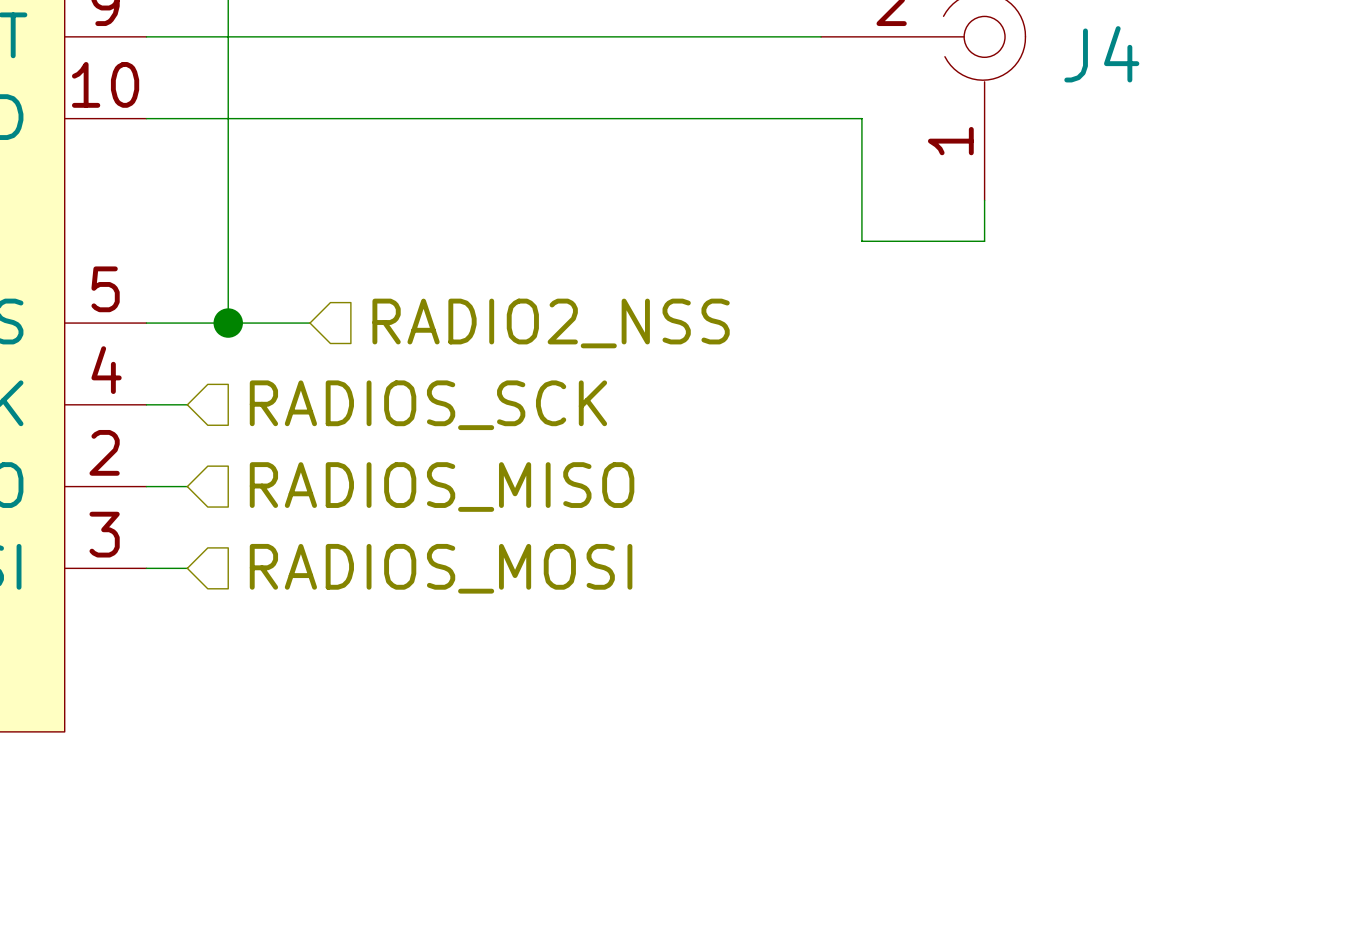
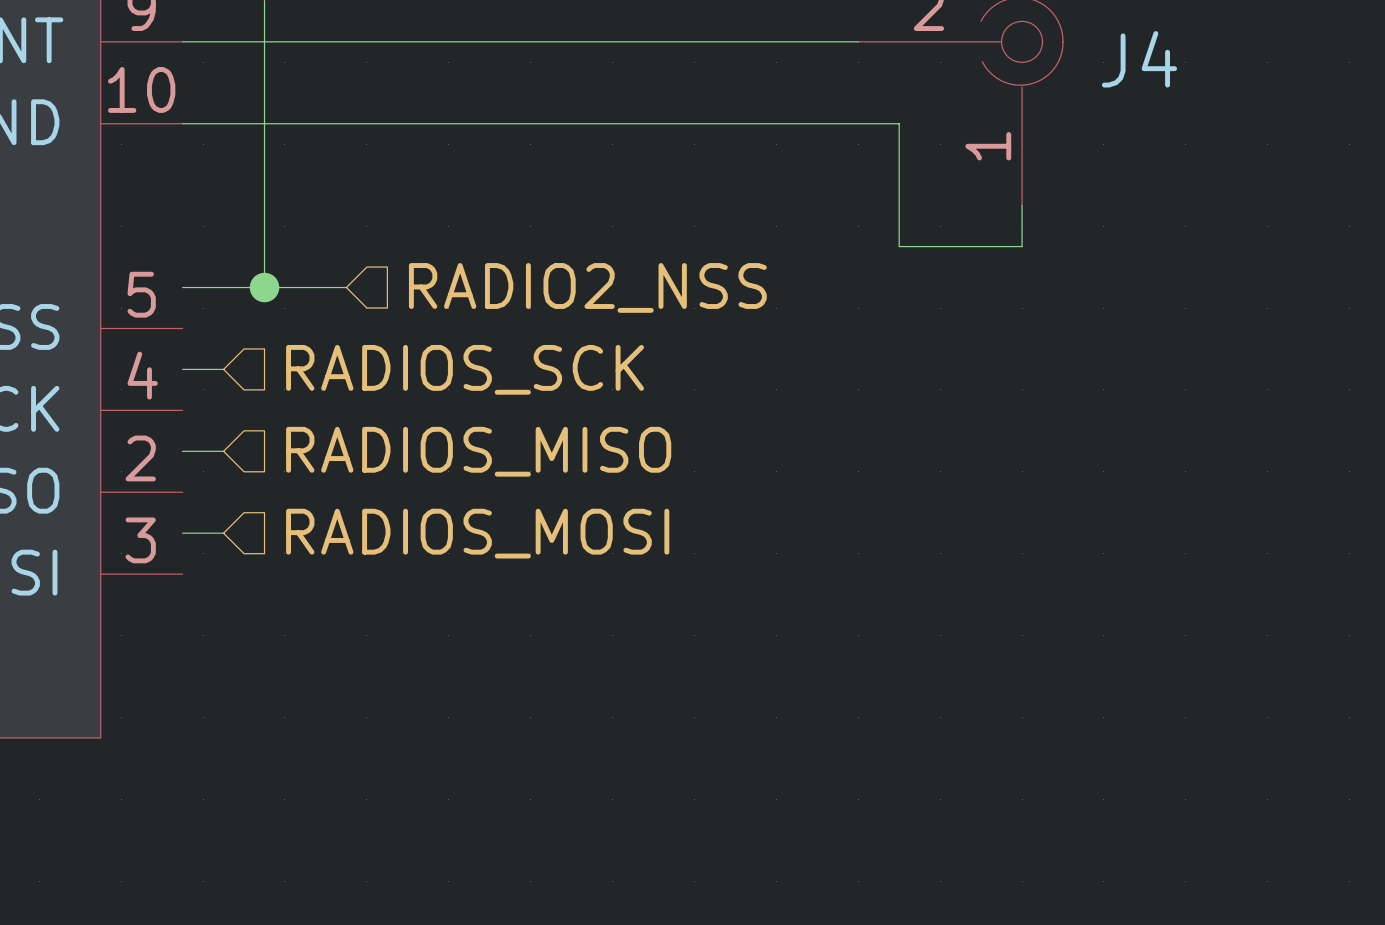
wire: (228, 282) (228, 323) -> none
wire: (146, 323) (310, 323) -> (182, 287) (346, 287)
junction position: (228, 323) -> (264, 287)
hierarchical label position: RADIO2_NSS (551, 323) -> RADIO2_NSS (587, 287)
wire: (146, 404) (187, 404) -> (182, 369) (223, 369)
hierarchical label position: RADIOS_SCK (428, 405) -> RADIOS_SCK (465, 369)
wire: (146, 486) (187, 486) -> (182, 451) (223, 451)
hierarchical label position: RADIOS_MISO (442, 487) -> RADIOS_MISO (478, 451)
wire: (146, 568) (187, 568) -> (182, 533) (223, 533)
hierarchical label position: RADIOS_MOSI (441, 568) -> RADIOS_MOSI (477, 533)

